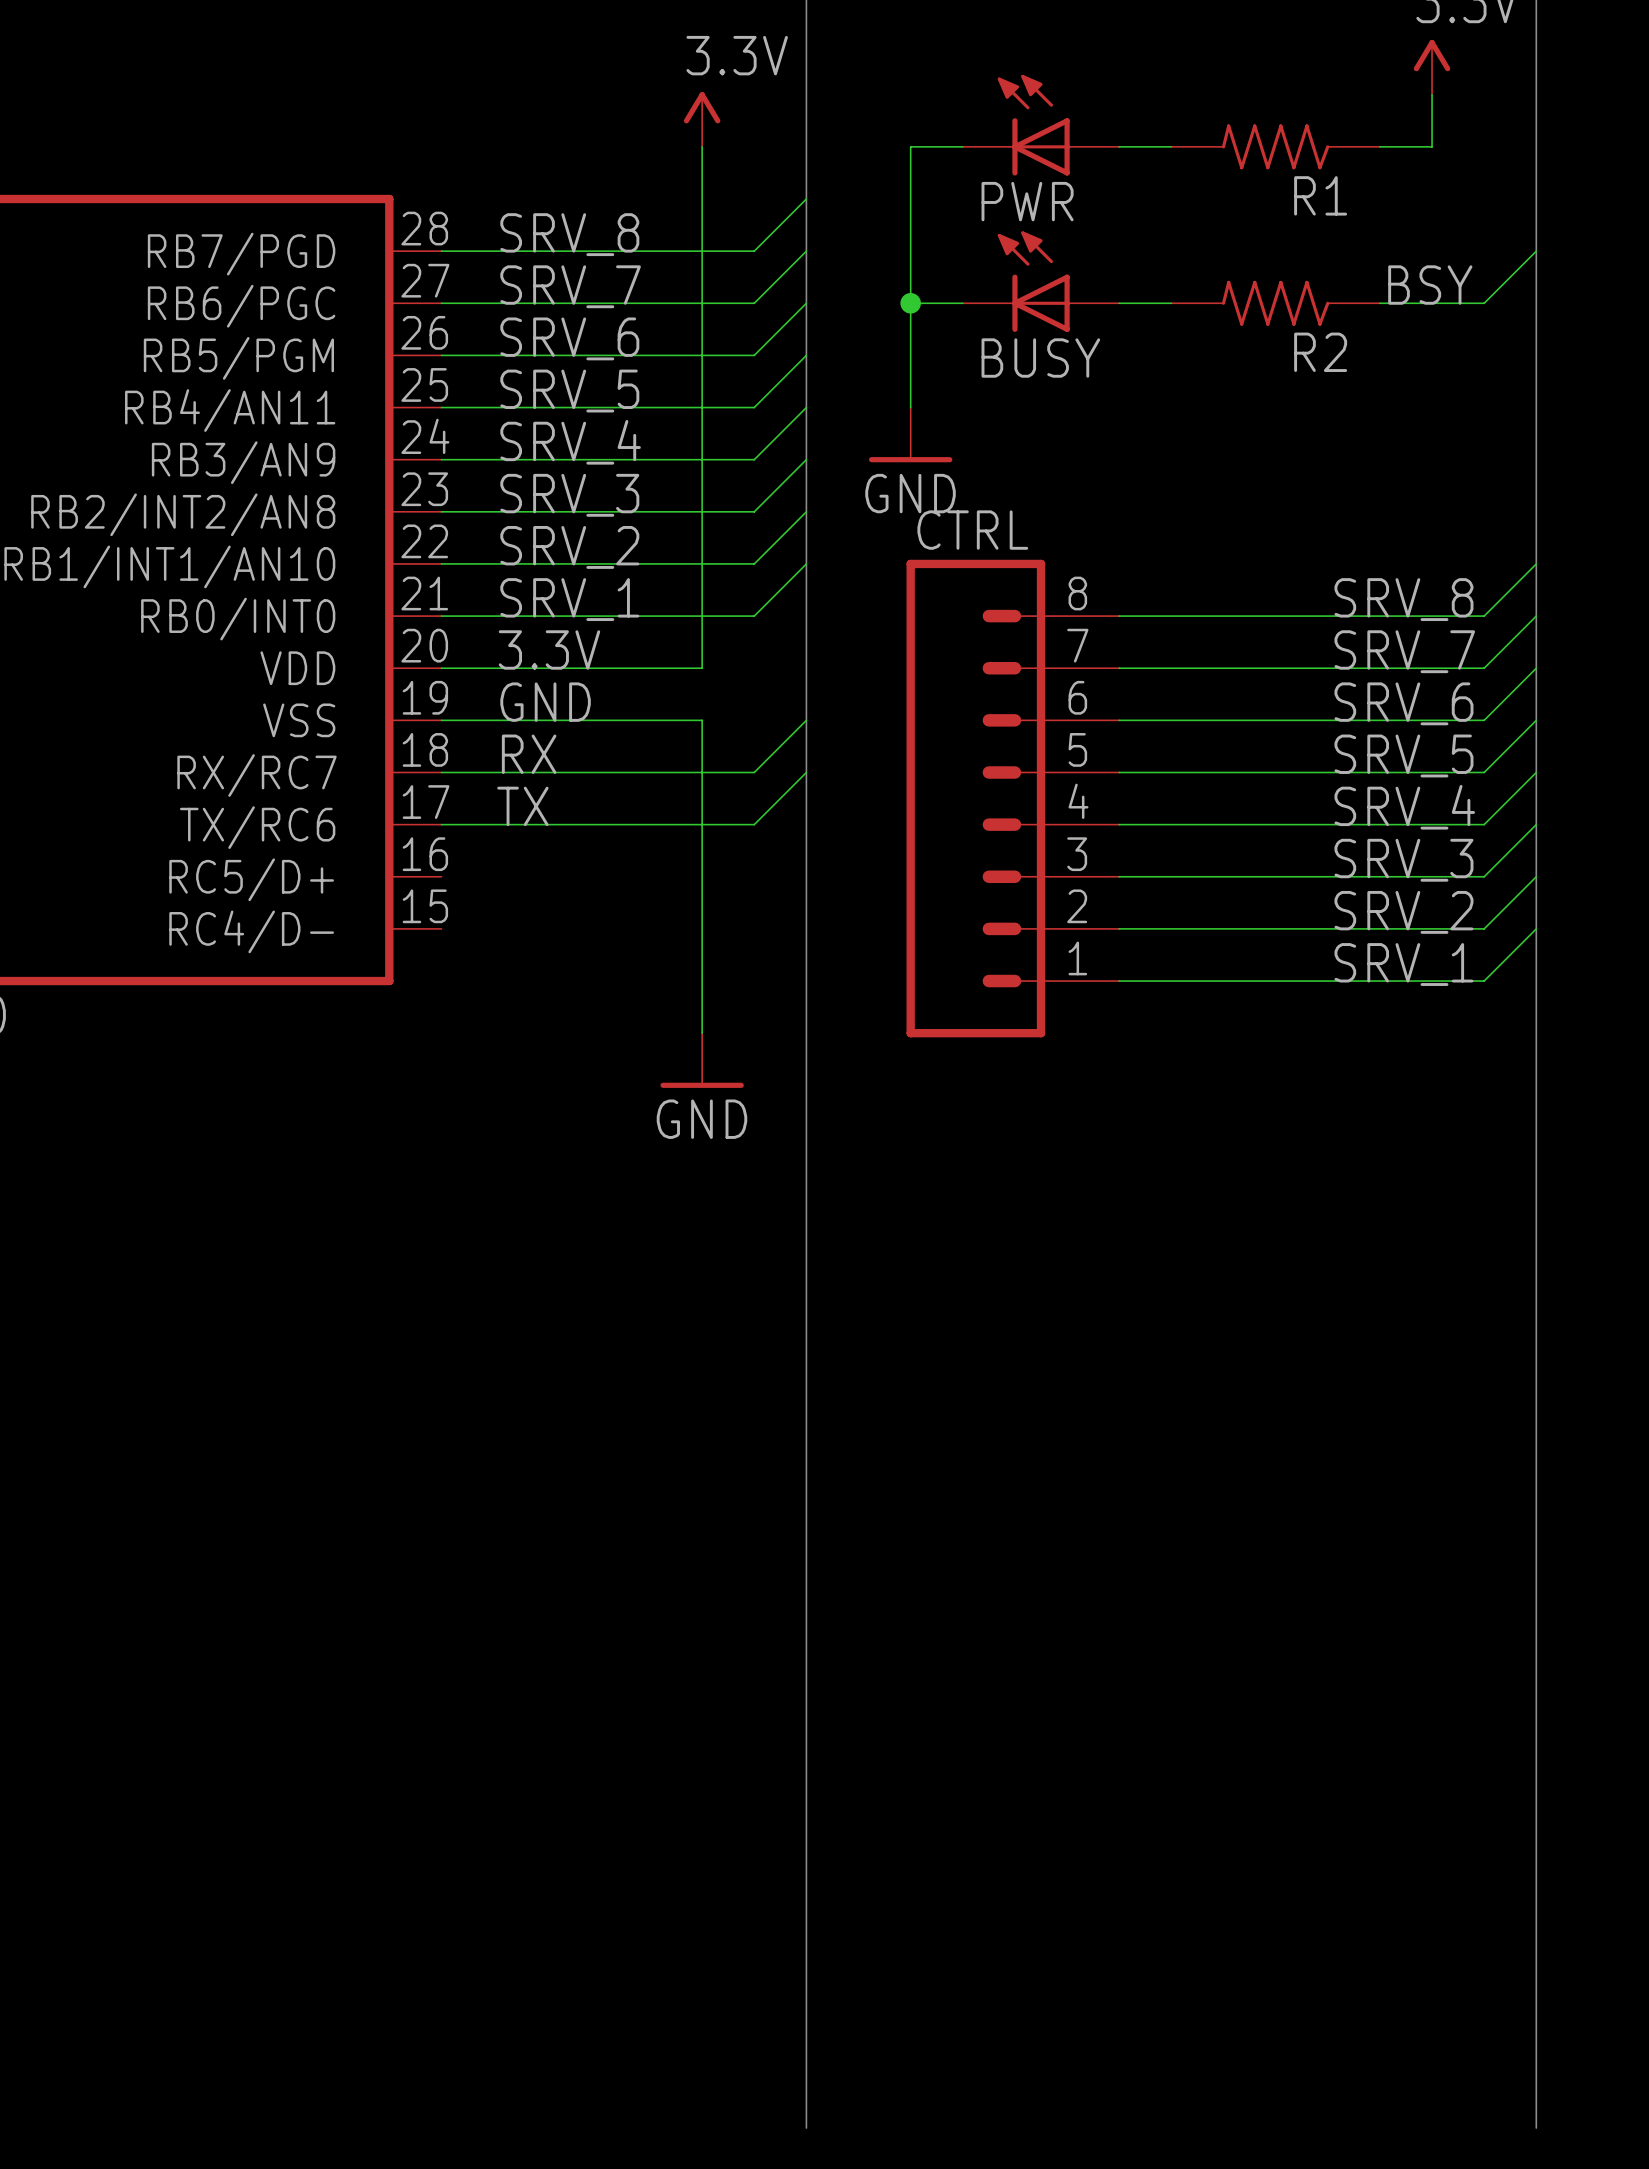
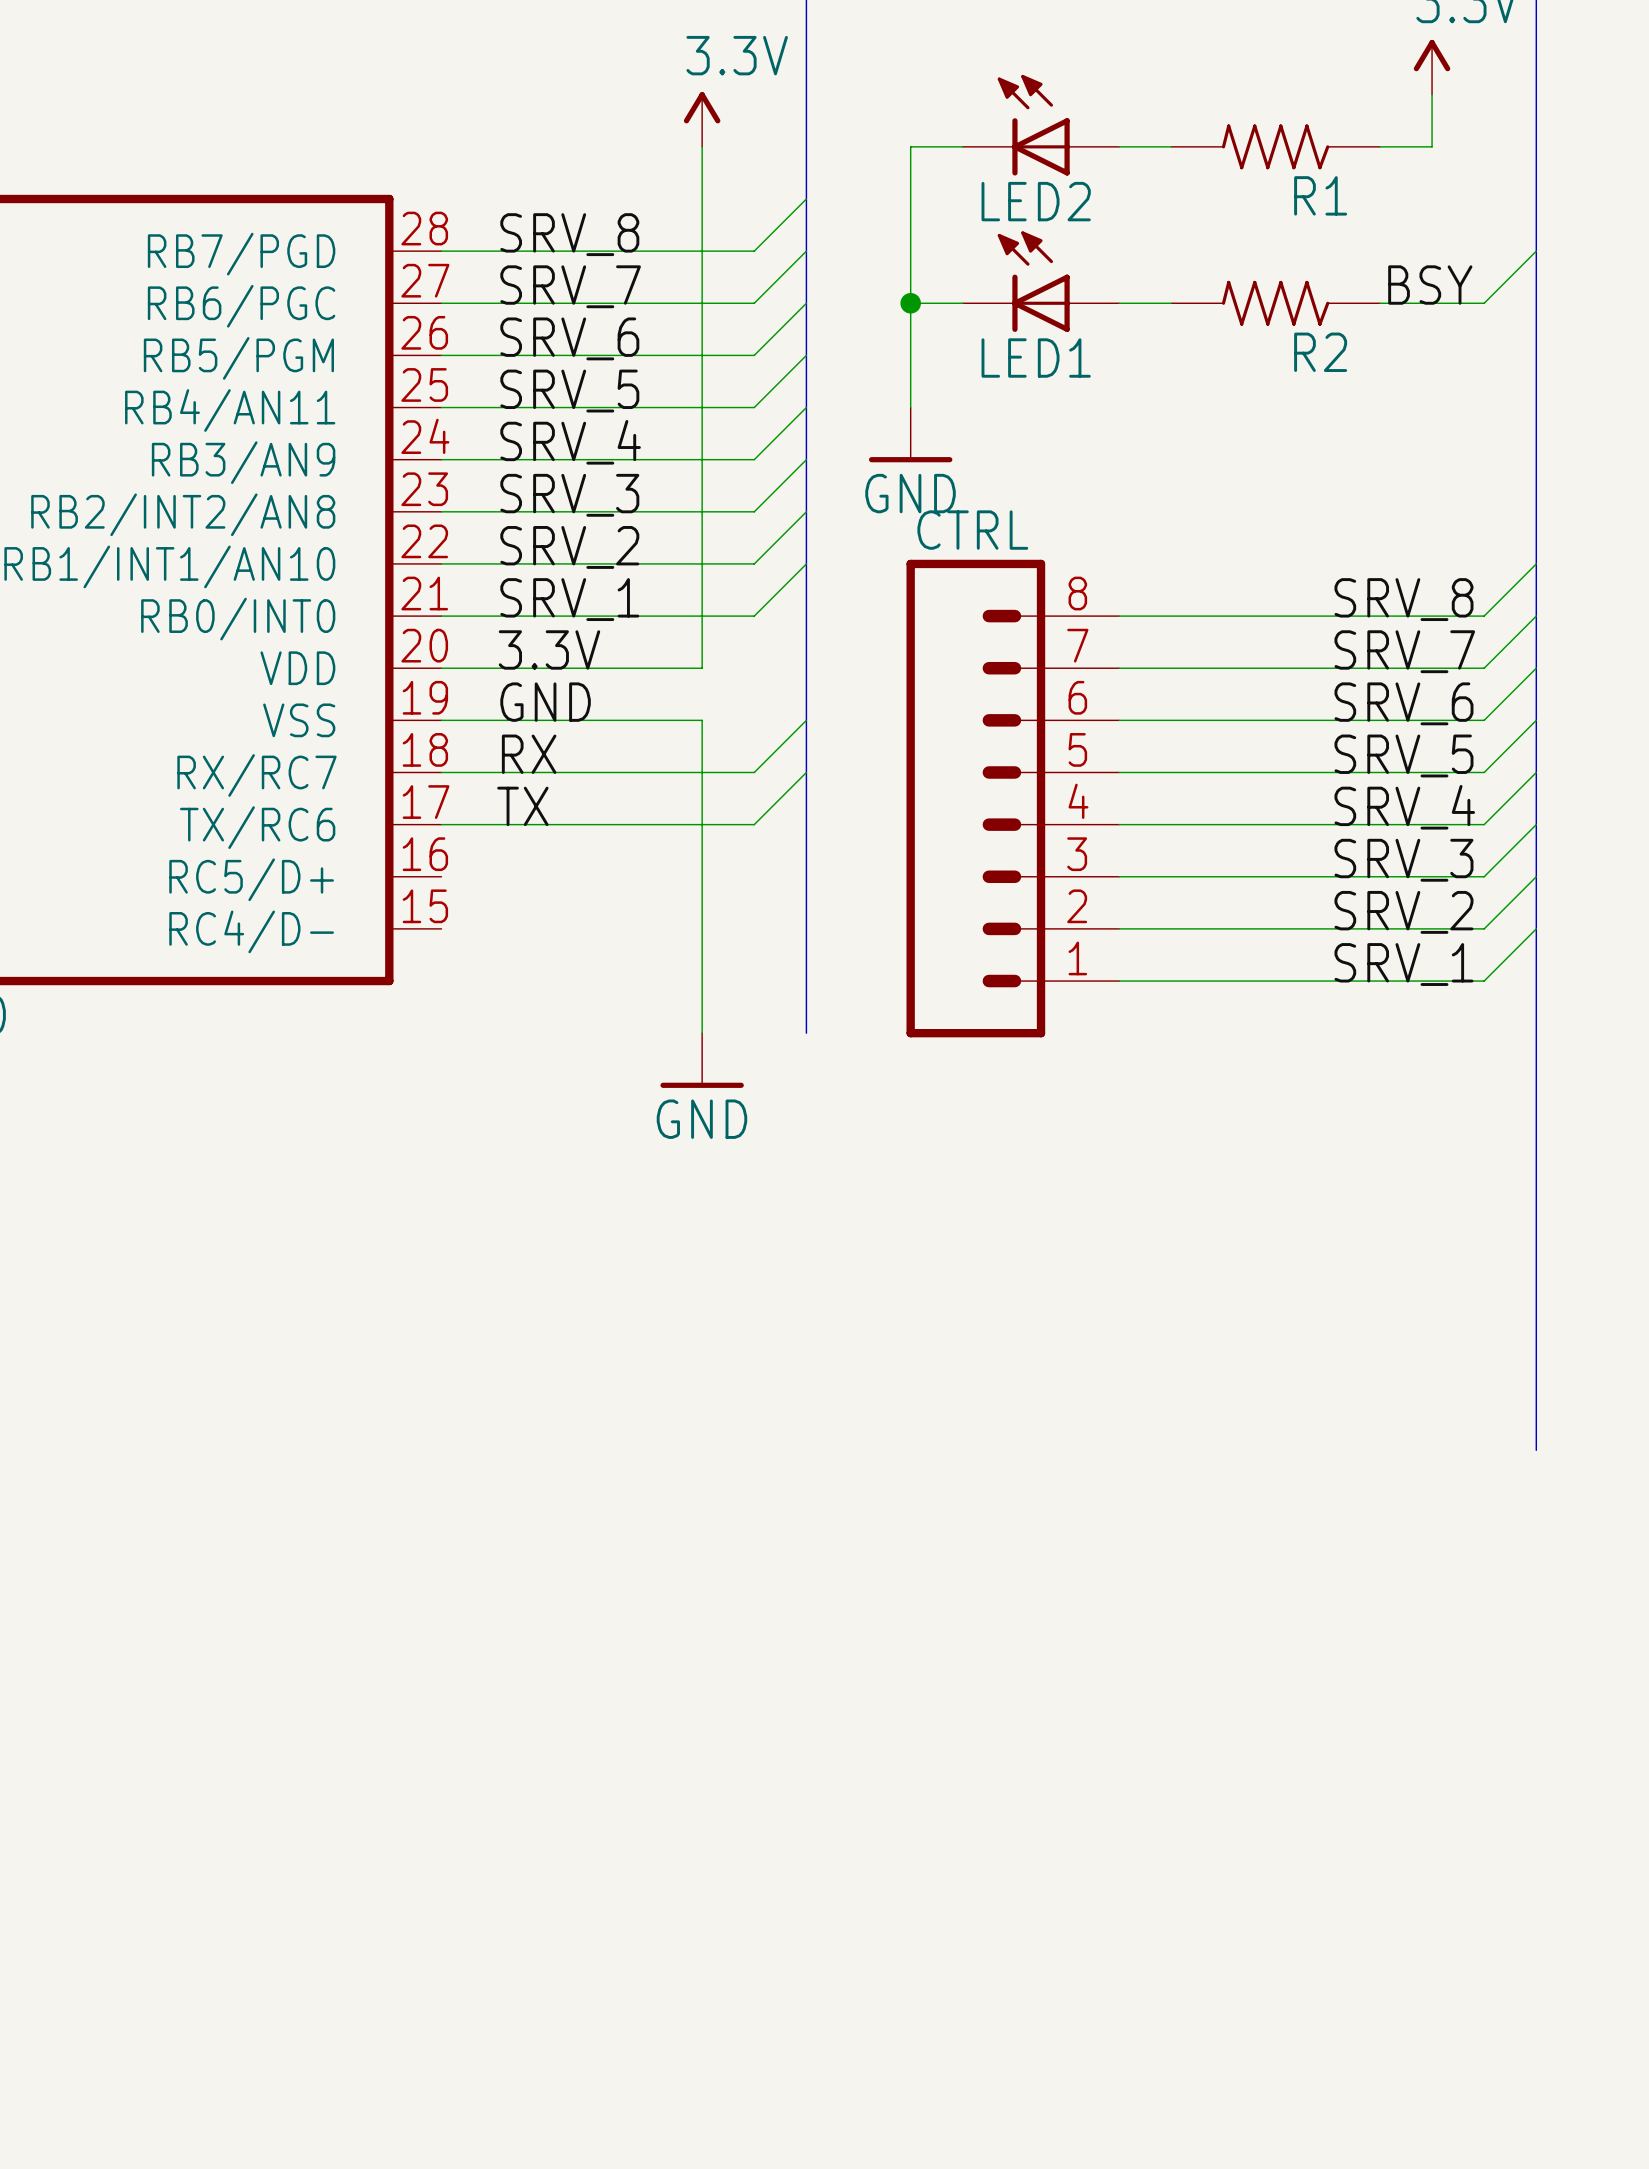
PWR name: PWR (1027, 201) -> LED2 (1036, 201)
BUSY name: BUSY (1040, 358) -> LED1 (1036, 358)
bus: (806, 1033) (806, 2128) -> none
bus: (1536, 1450) (1536, 2128) -> none

